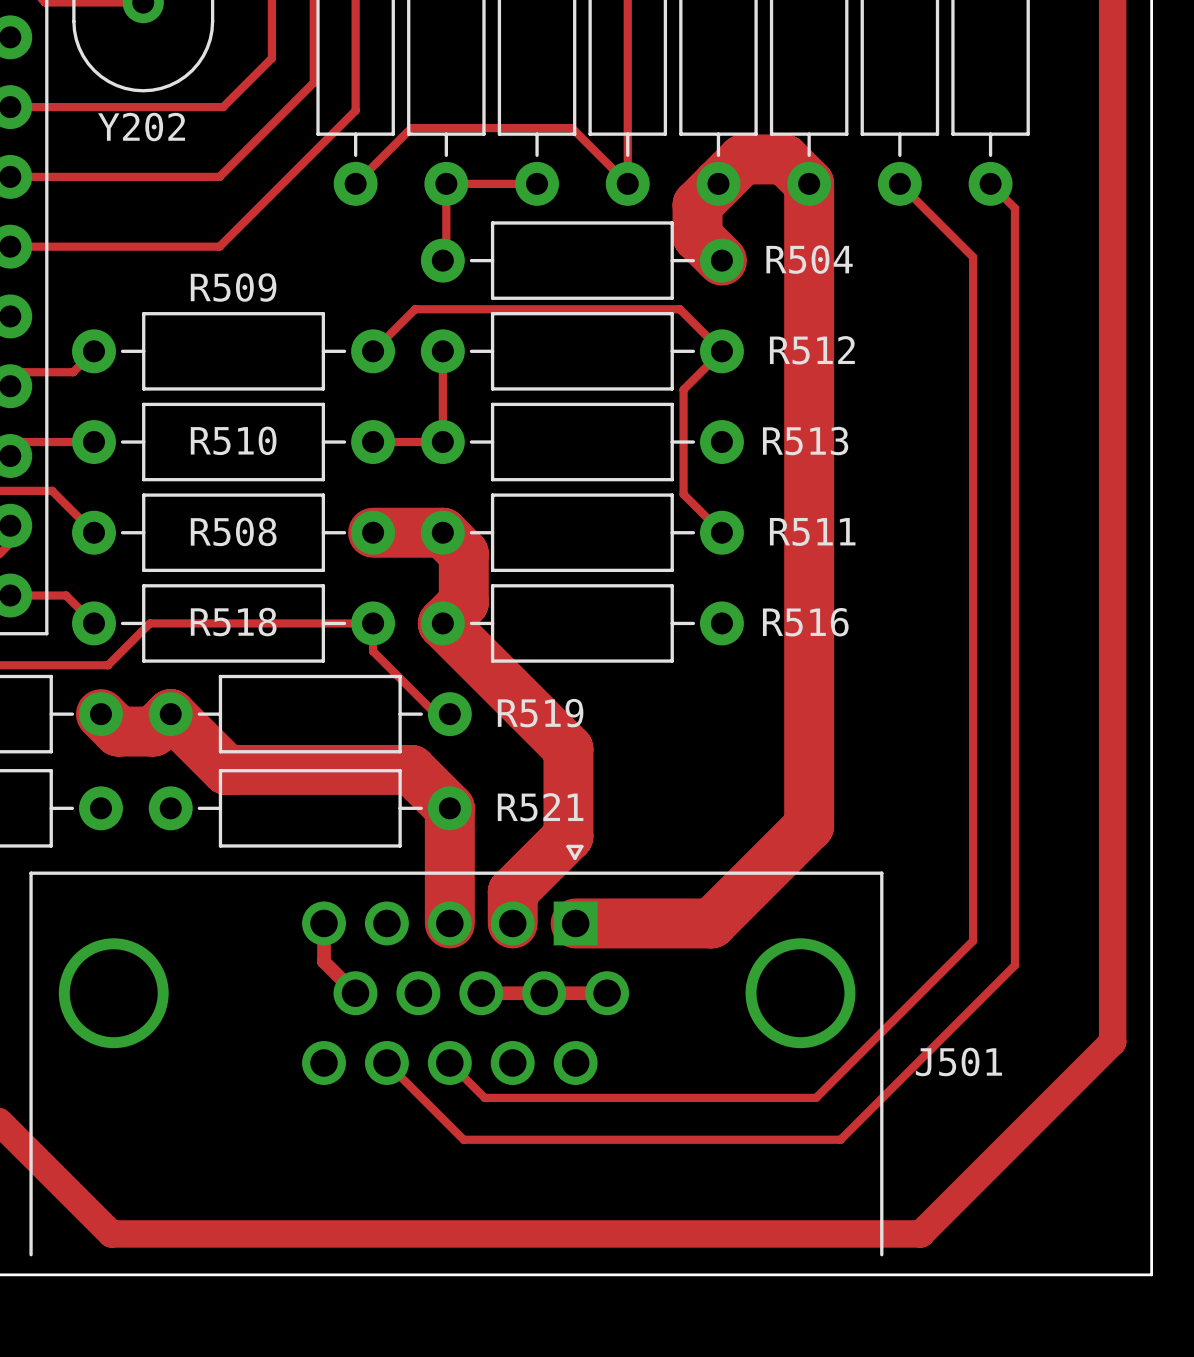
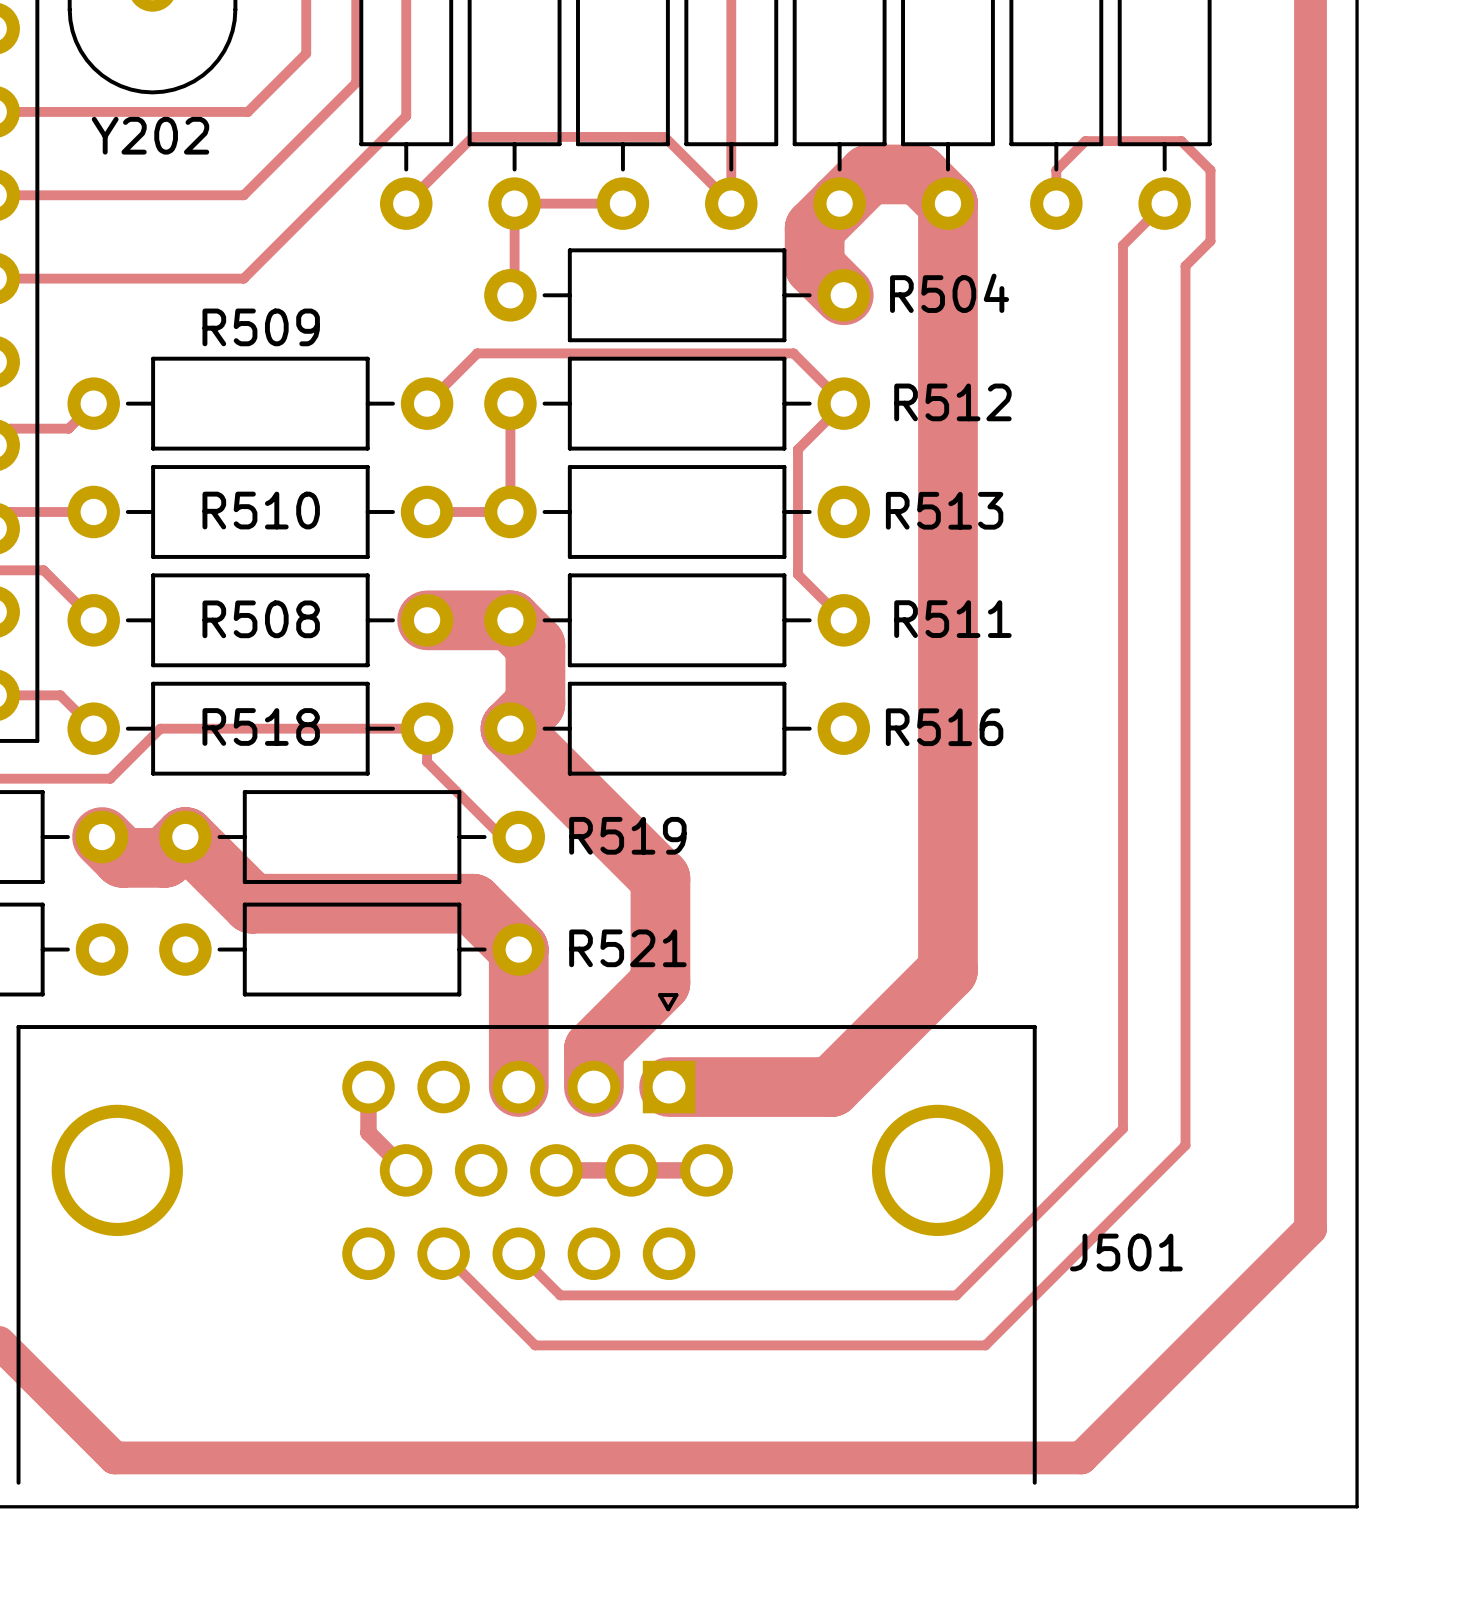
track: (899, 183) (973, 257) (973, 940) (955, 958) -> (1056, 203) (1056, 170) (1085, 141) (1181, 141) (1210, 170) (1210, 241) (1185, 266) (1185, 1145)
track: (990, 183) (1014, 208) (1014, 965) (1008, 972) -> (1164, 203) (1123, 245) (1123, 1128)

